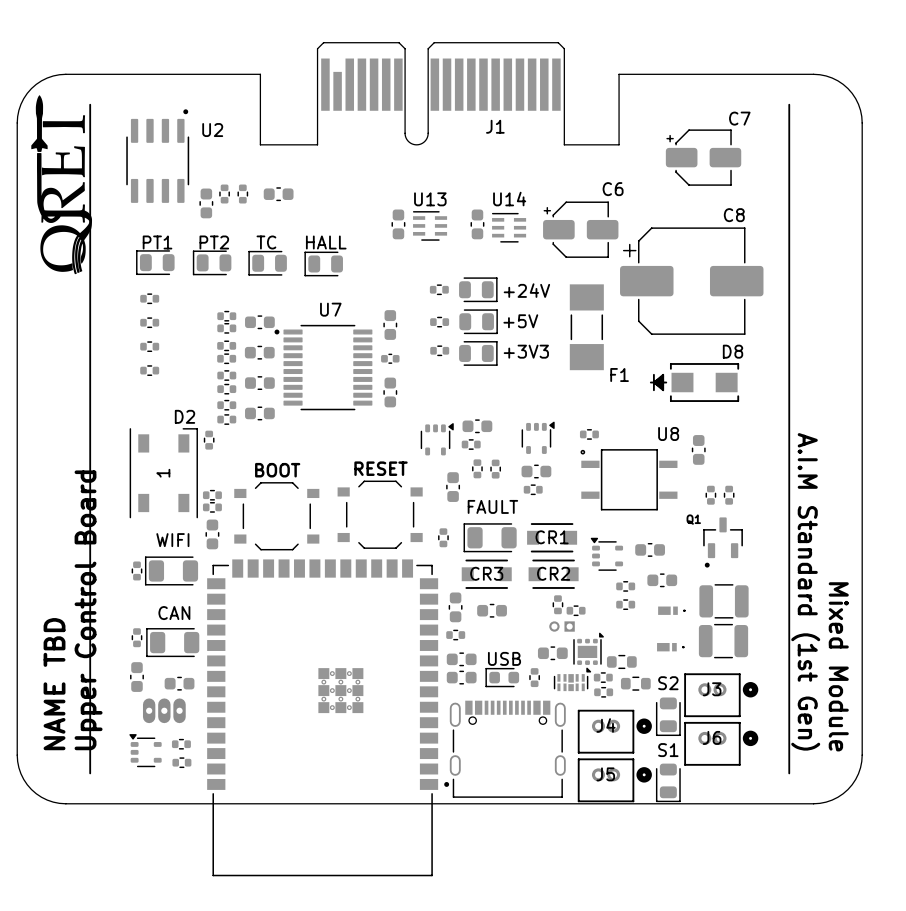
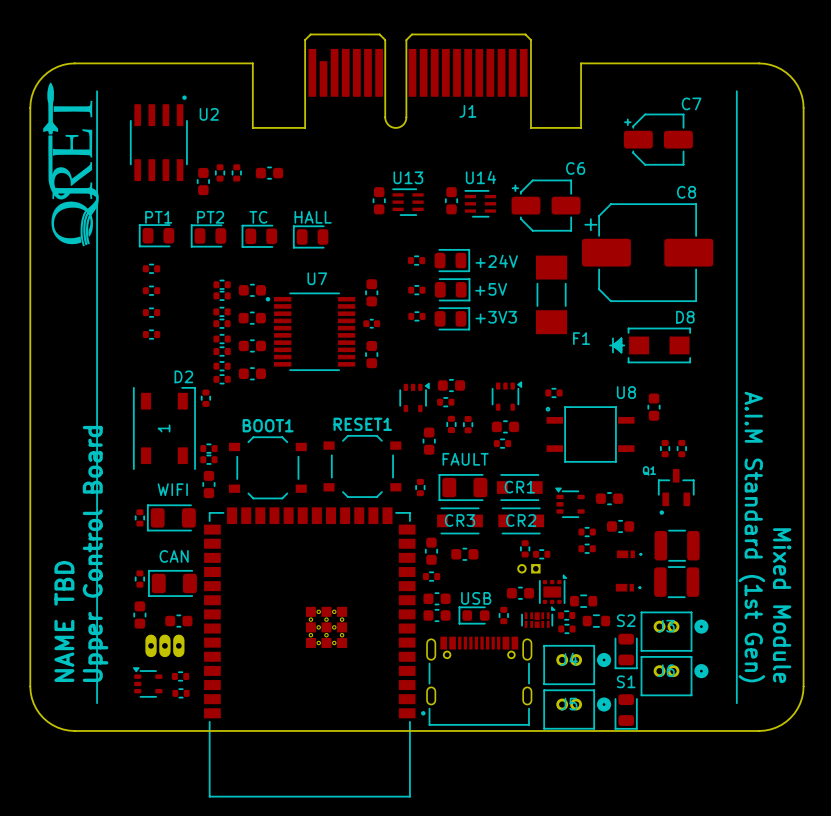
RESET name: RESET (381, 468) -> RESET1 (362, 424)
BOOT name: BOOT (277, 470) -> BOOT1 (268, 425)

